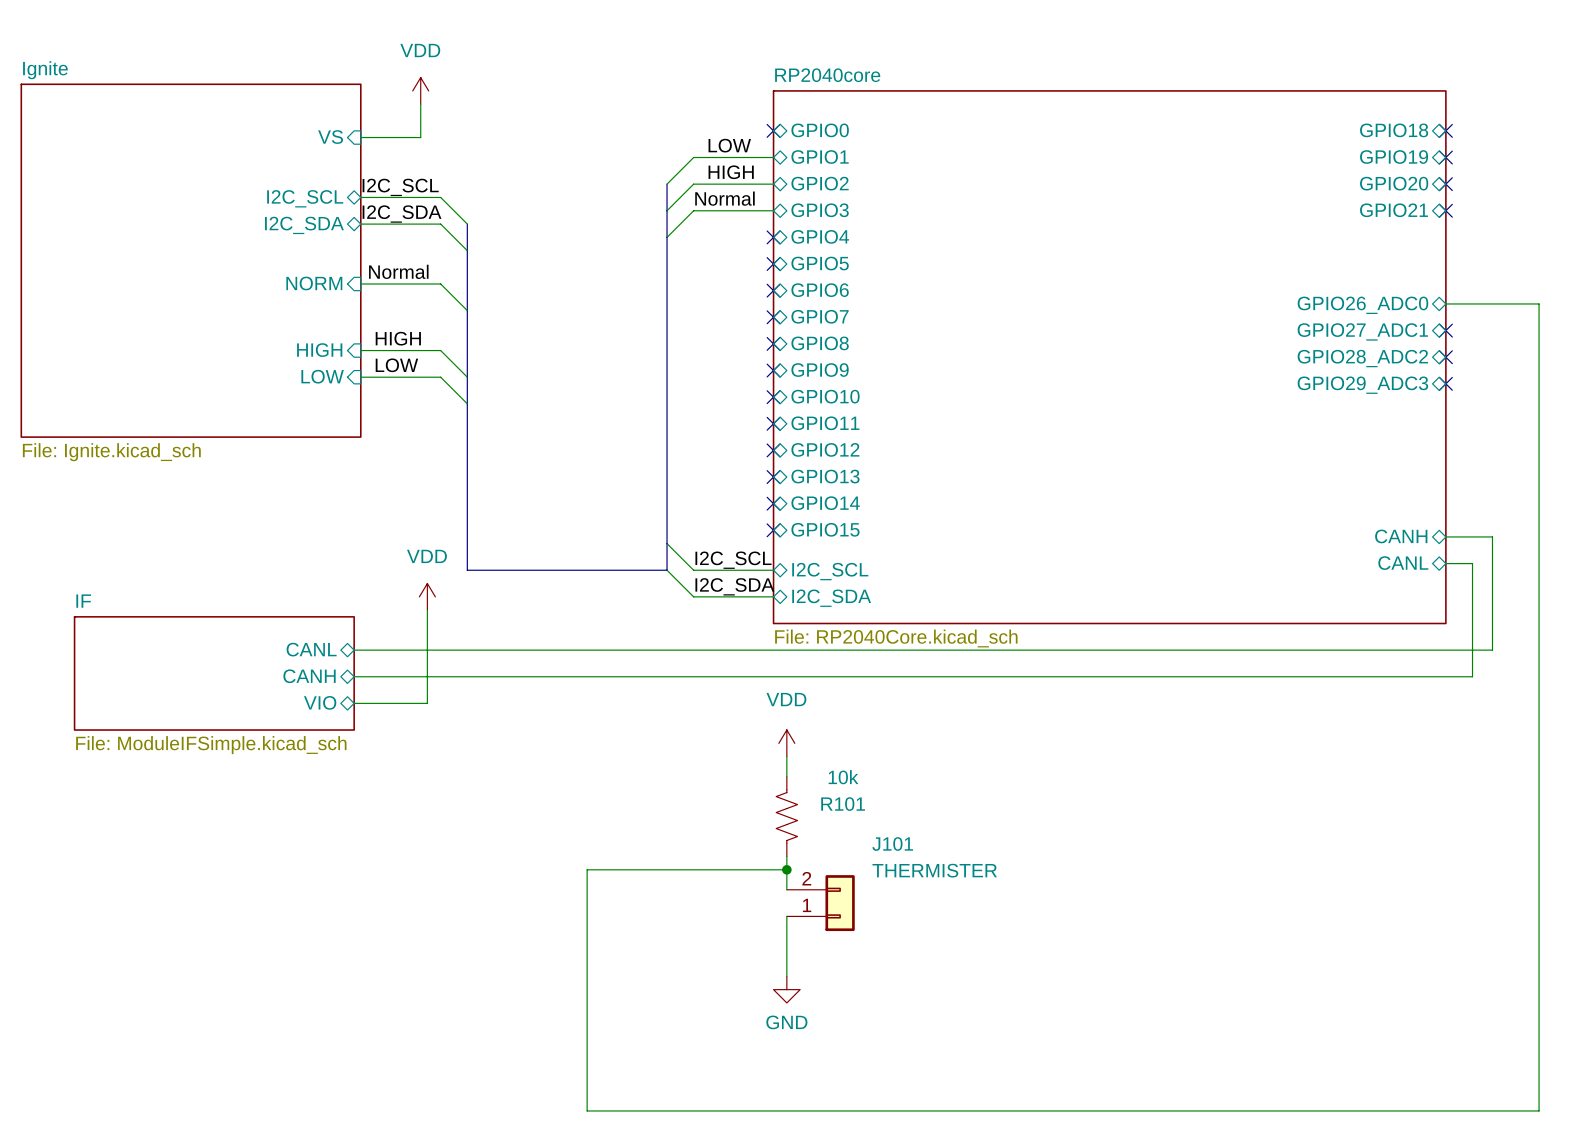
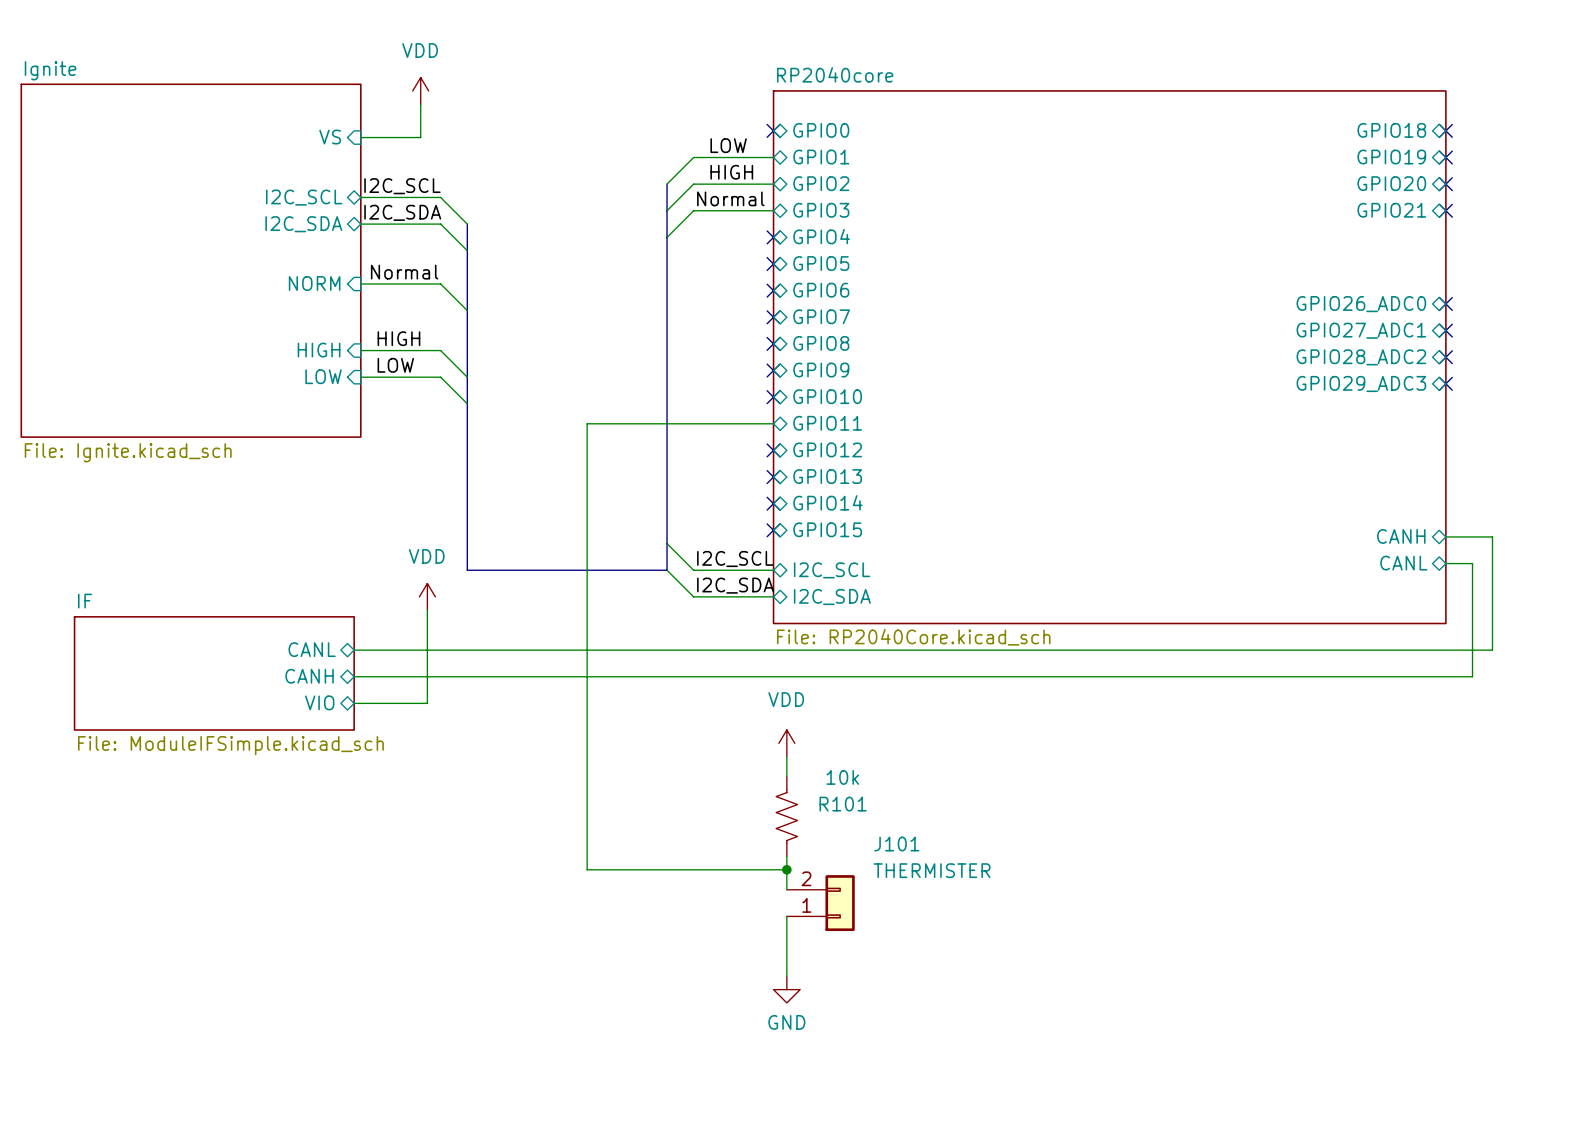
wire: (1445, 303) (1539, 303) (1539, 1110) (587, 1110) (587, 869) -> (773, 423) (587, 423) (587, 869)
no-connect mark: none -> (1445, 303)
no-connect mark: (773, 423) -> none

